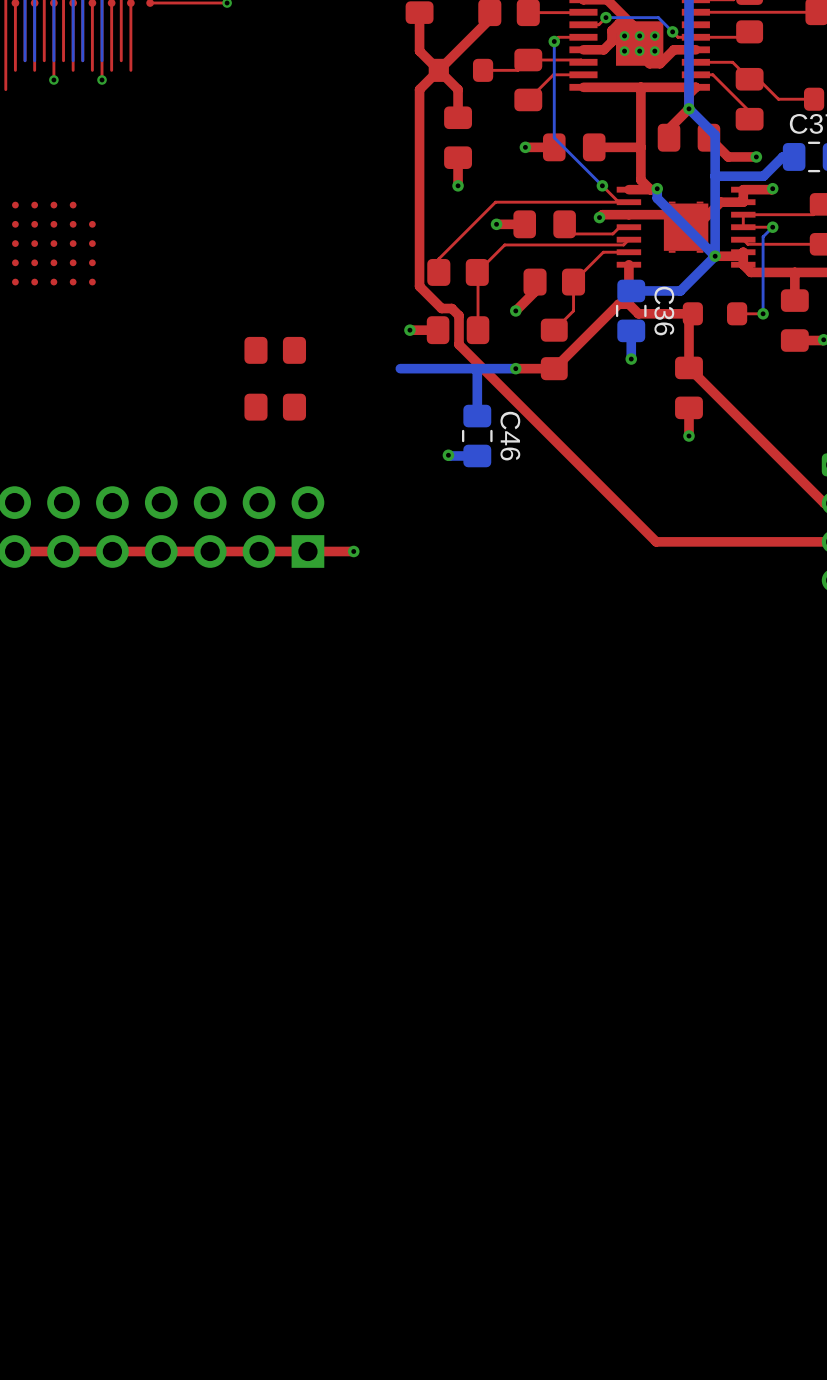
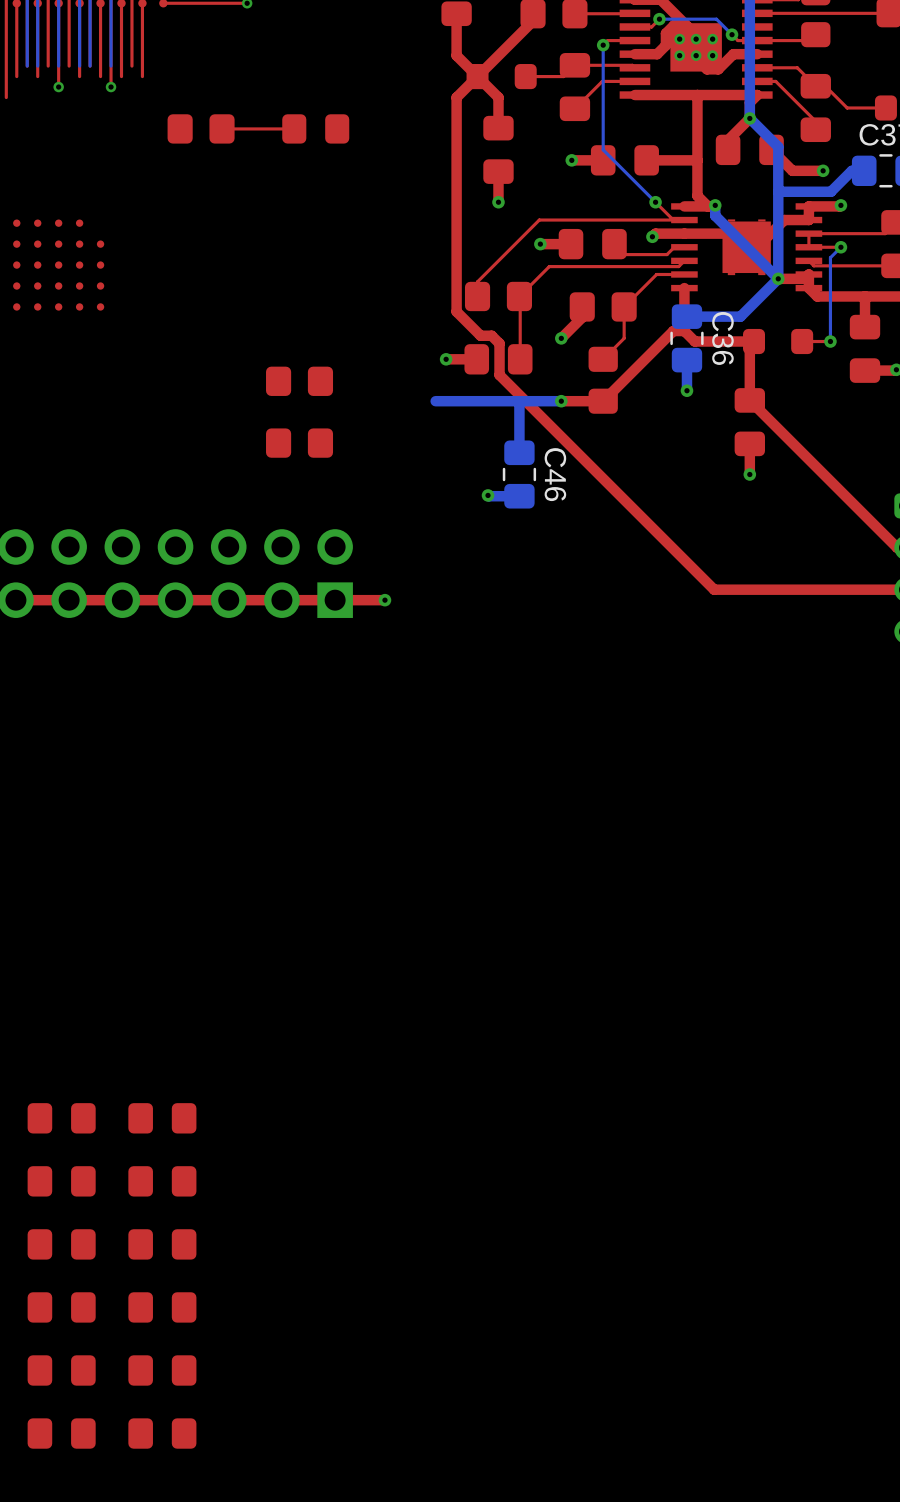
part: none -> (201, 128)
top track: none -> (294, 128) (222, 128)
part: none -> (315, 128)
part: none -> (61, 1118)
part: none -> (162, 1118)
part: none -> (61, 1181)
part: none -> (162, 1181)
part: none -> (61, 1244)
part: none -> (162, 1244)
part: none -> (61, 1307)
part: none -> (162, 1307)
part: none -> (61, 1370)
part: none -> (162, 1370)
part: none -> (61, 1433)
part: none -> (162, 1433)

